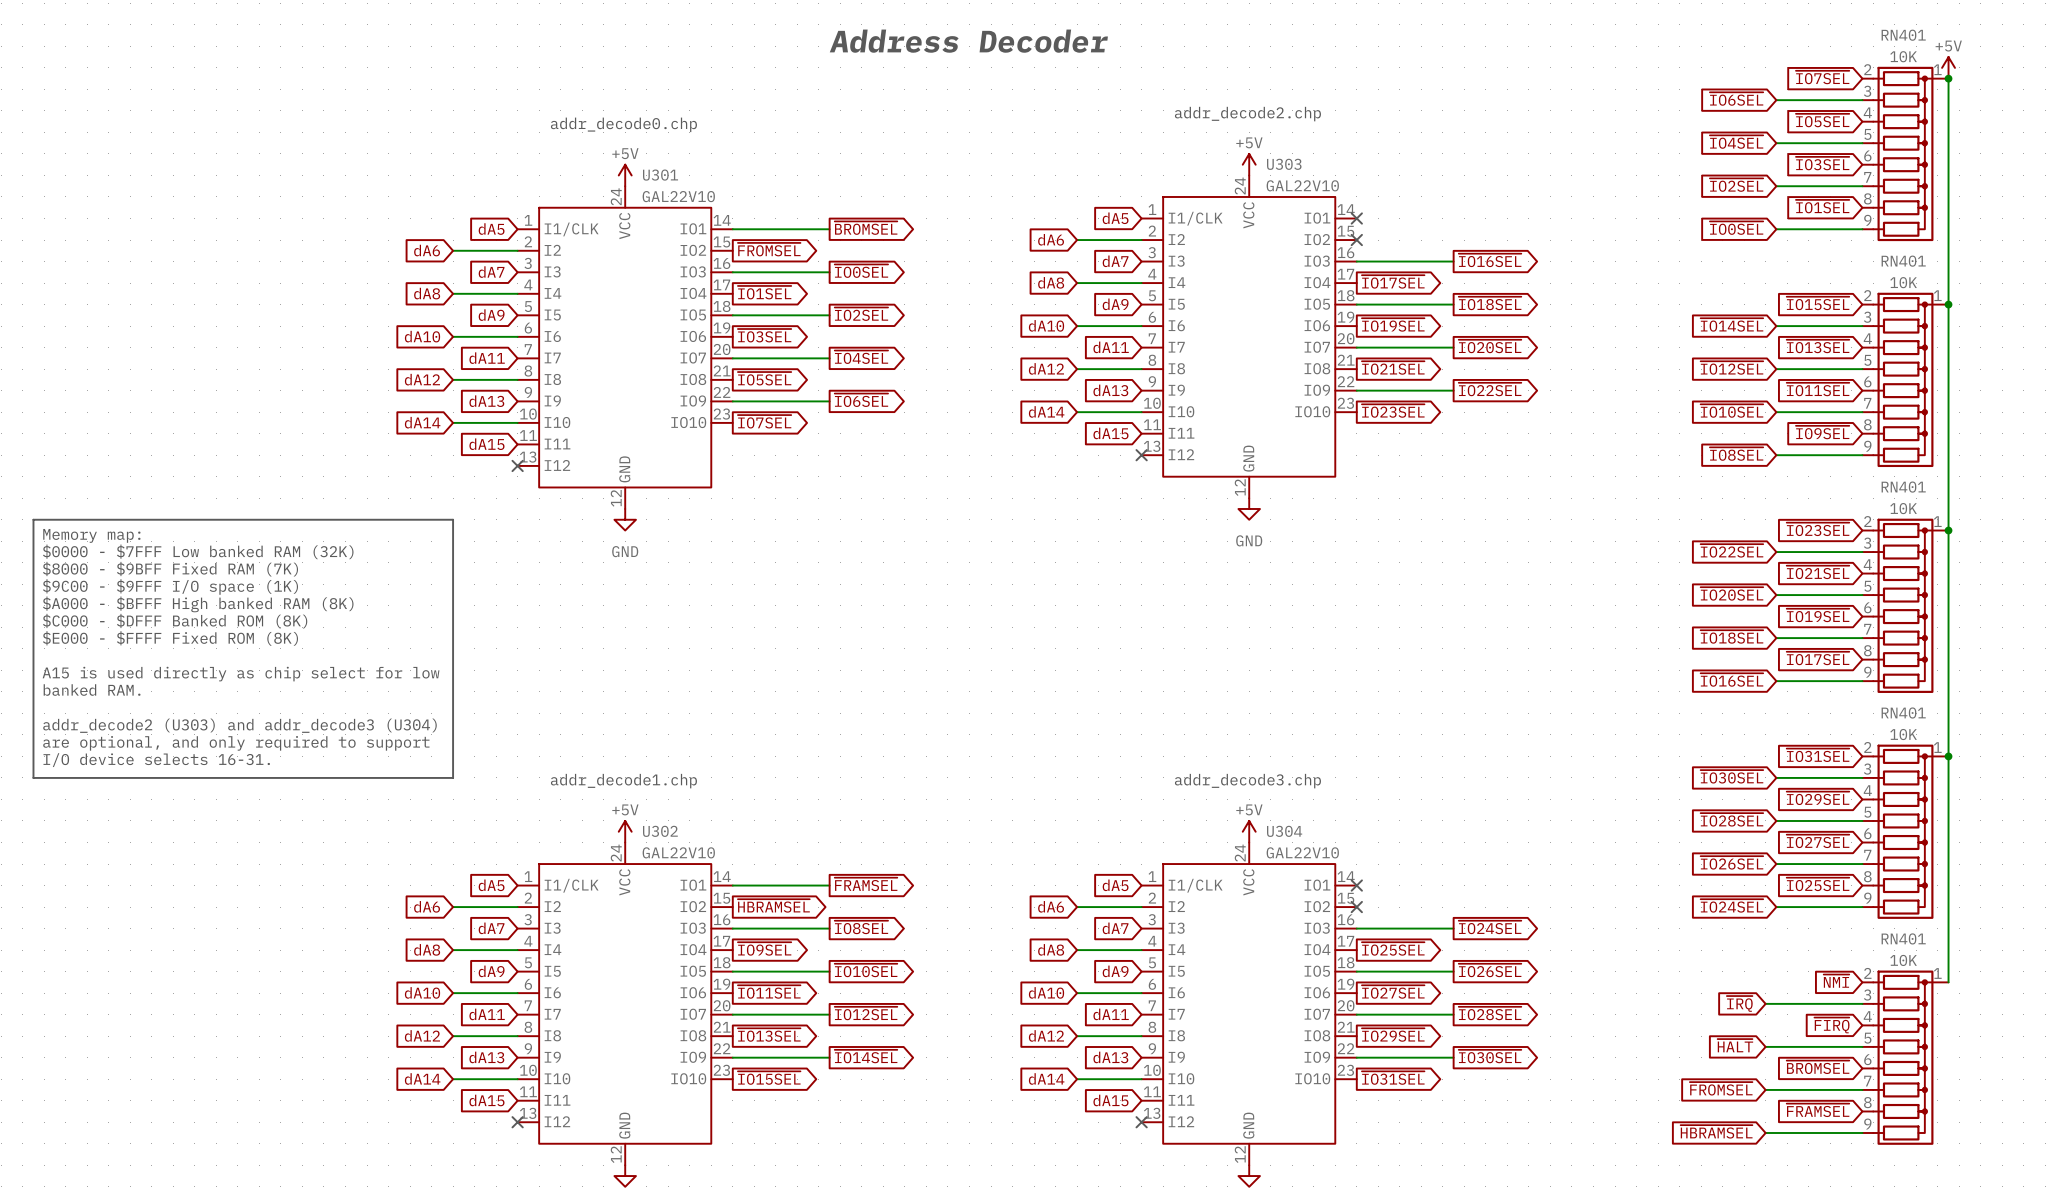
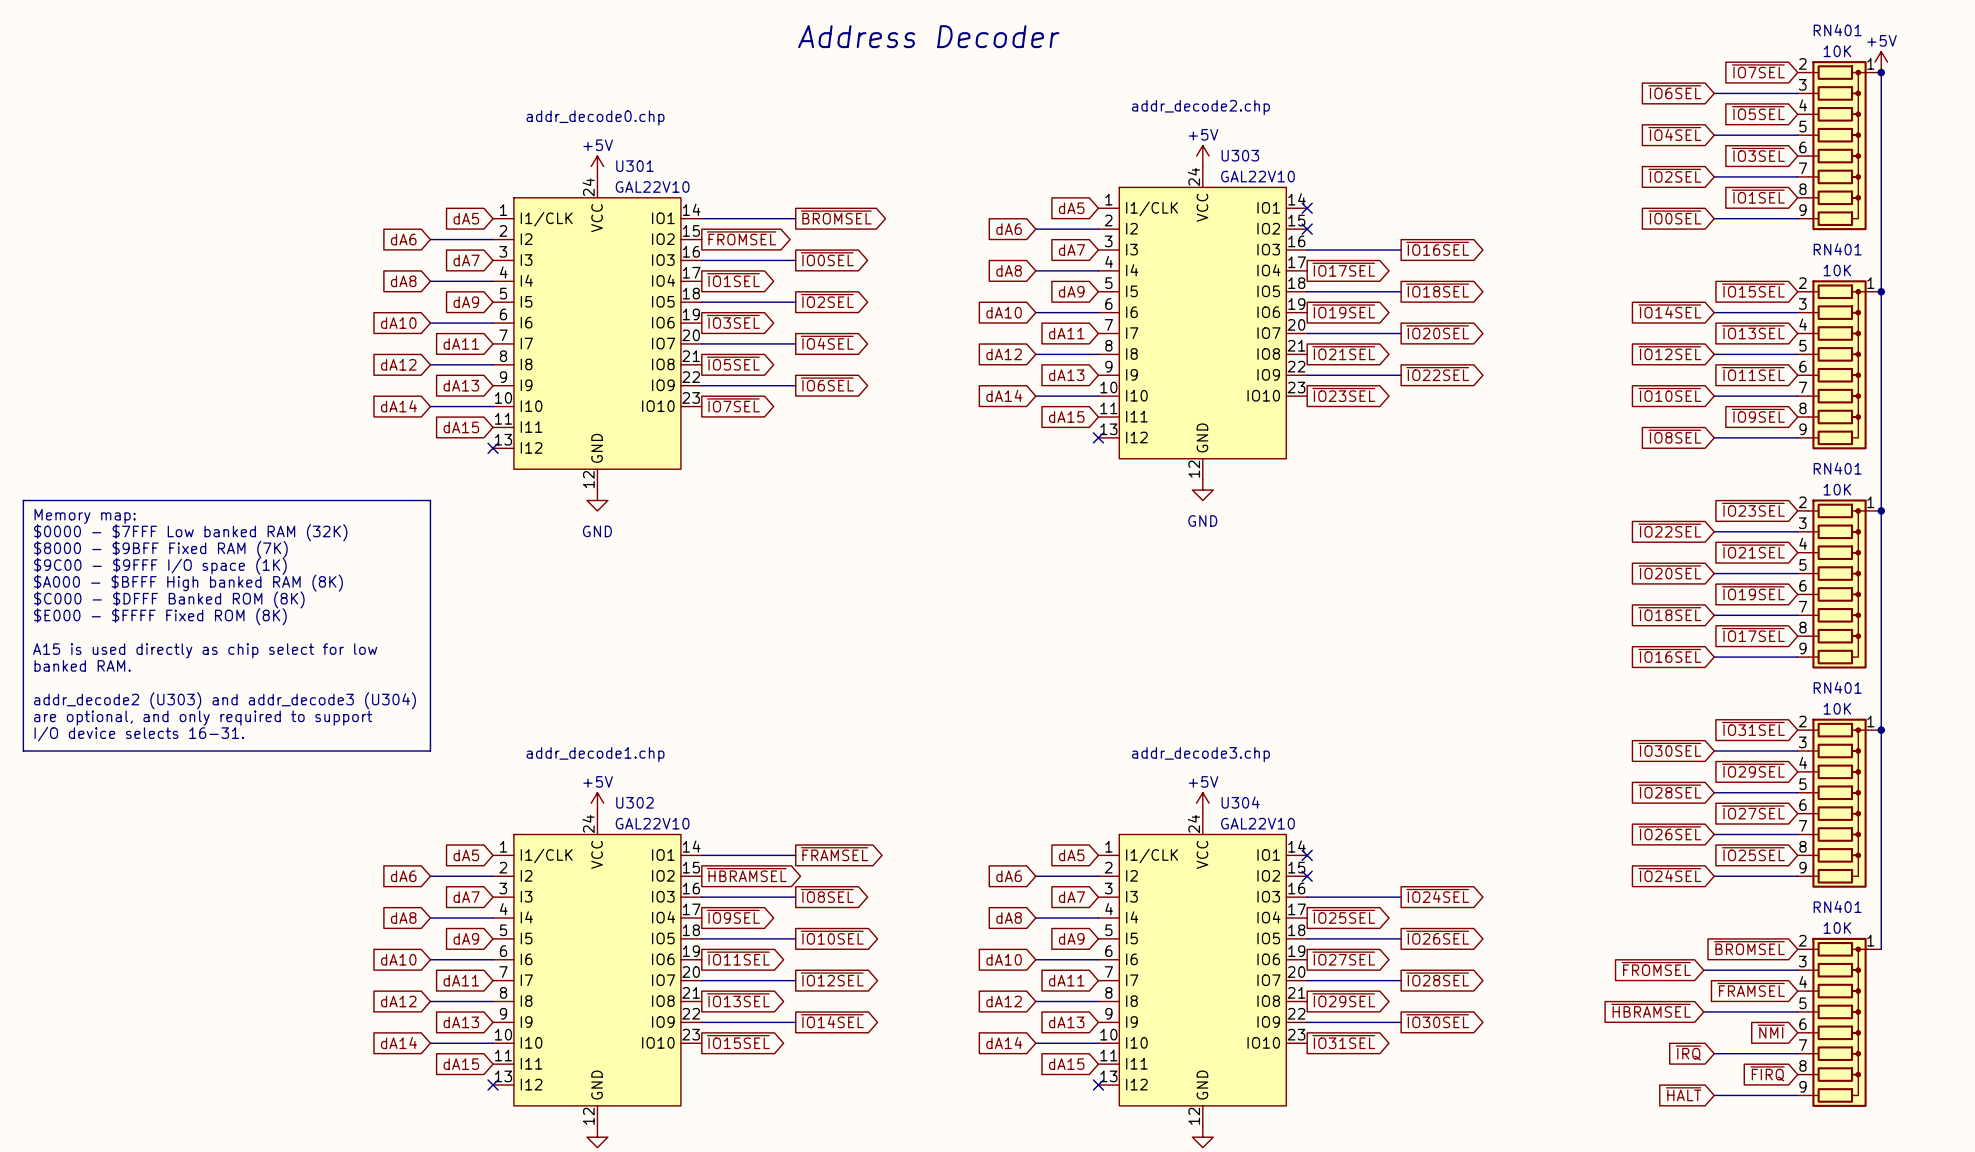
global label: ~{NMI} (1836, 981) -> ~{BROMSEL} (1749, 948)
global label: ~{IRQ} (1739, 1003) -> ~{FROMSEL} (1656, 968)
global label: ~{FIRQ} (1831, 1025) -> ~{FRAMSEL} (1751, 989)
global label: ~{HALT} (1735, 1045) -> ~{HBRAMSEL} (1651, 1010)
global label: ~{BROMSEL} (1818, 1067) -> ~{NMI} (1771, 1031)
global label: ~{FROMSEL} (1721, 1088) -> none
global label: none -> ~{IRQ} (1688, 1052)
wire: (1765, 1089) (1776, 1089) -> none
global label: ~{FRAMSEL} (1818, 1110) -> ~{FIRQ} (1767, 1073)
global label: ~{HBRAMSEL} (1716, 1131) -> ~{HALT} (1683, 1094)
wire: (1765, 1132) (1776, 1132) -> none

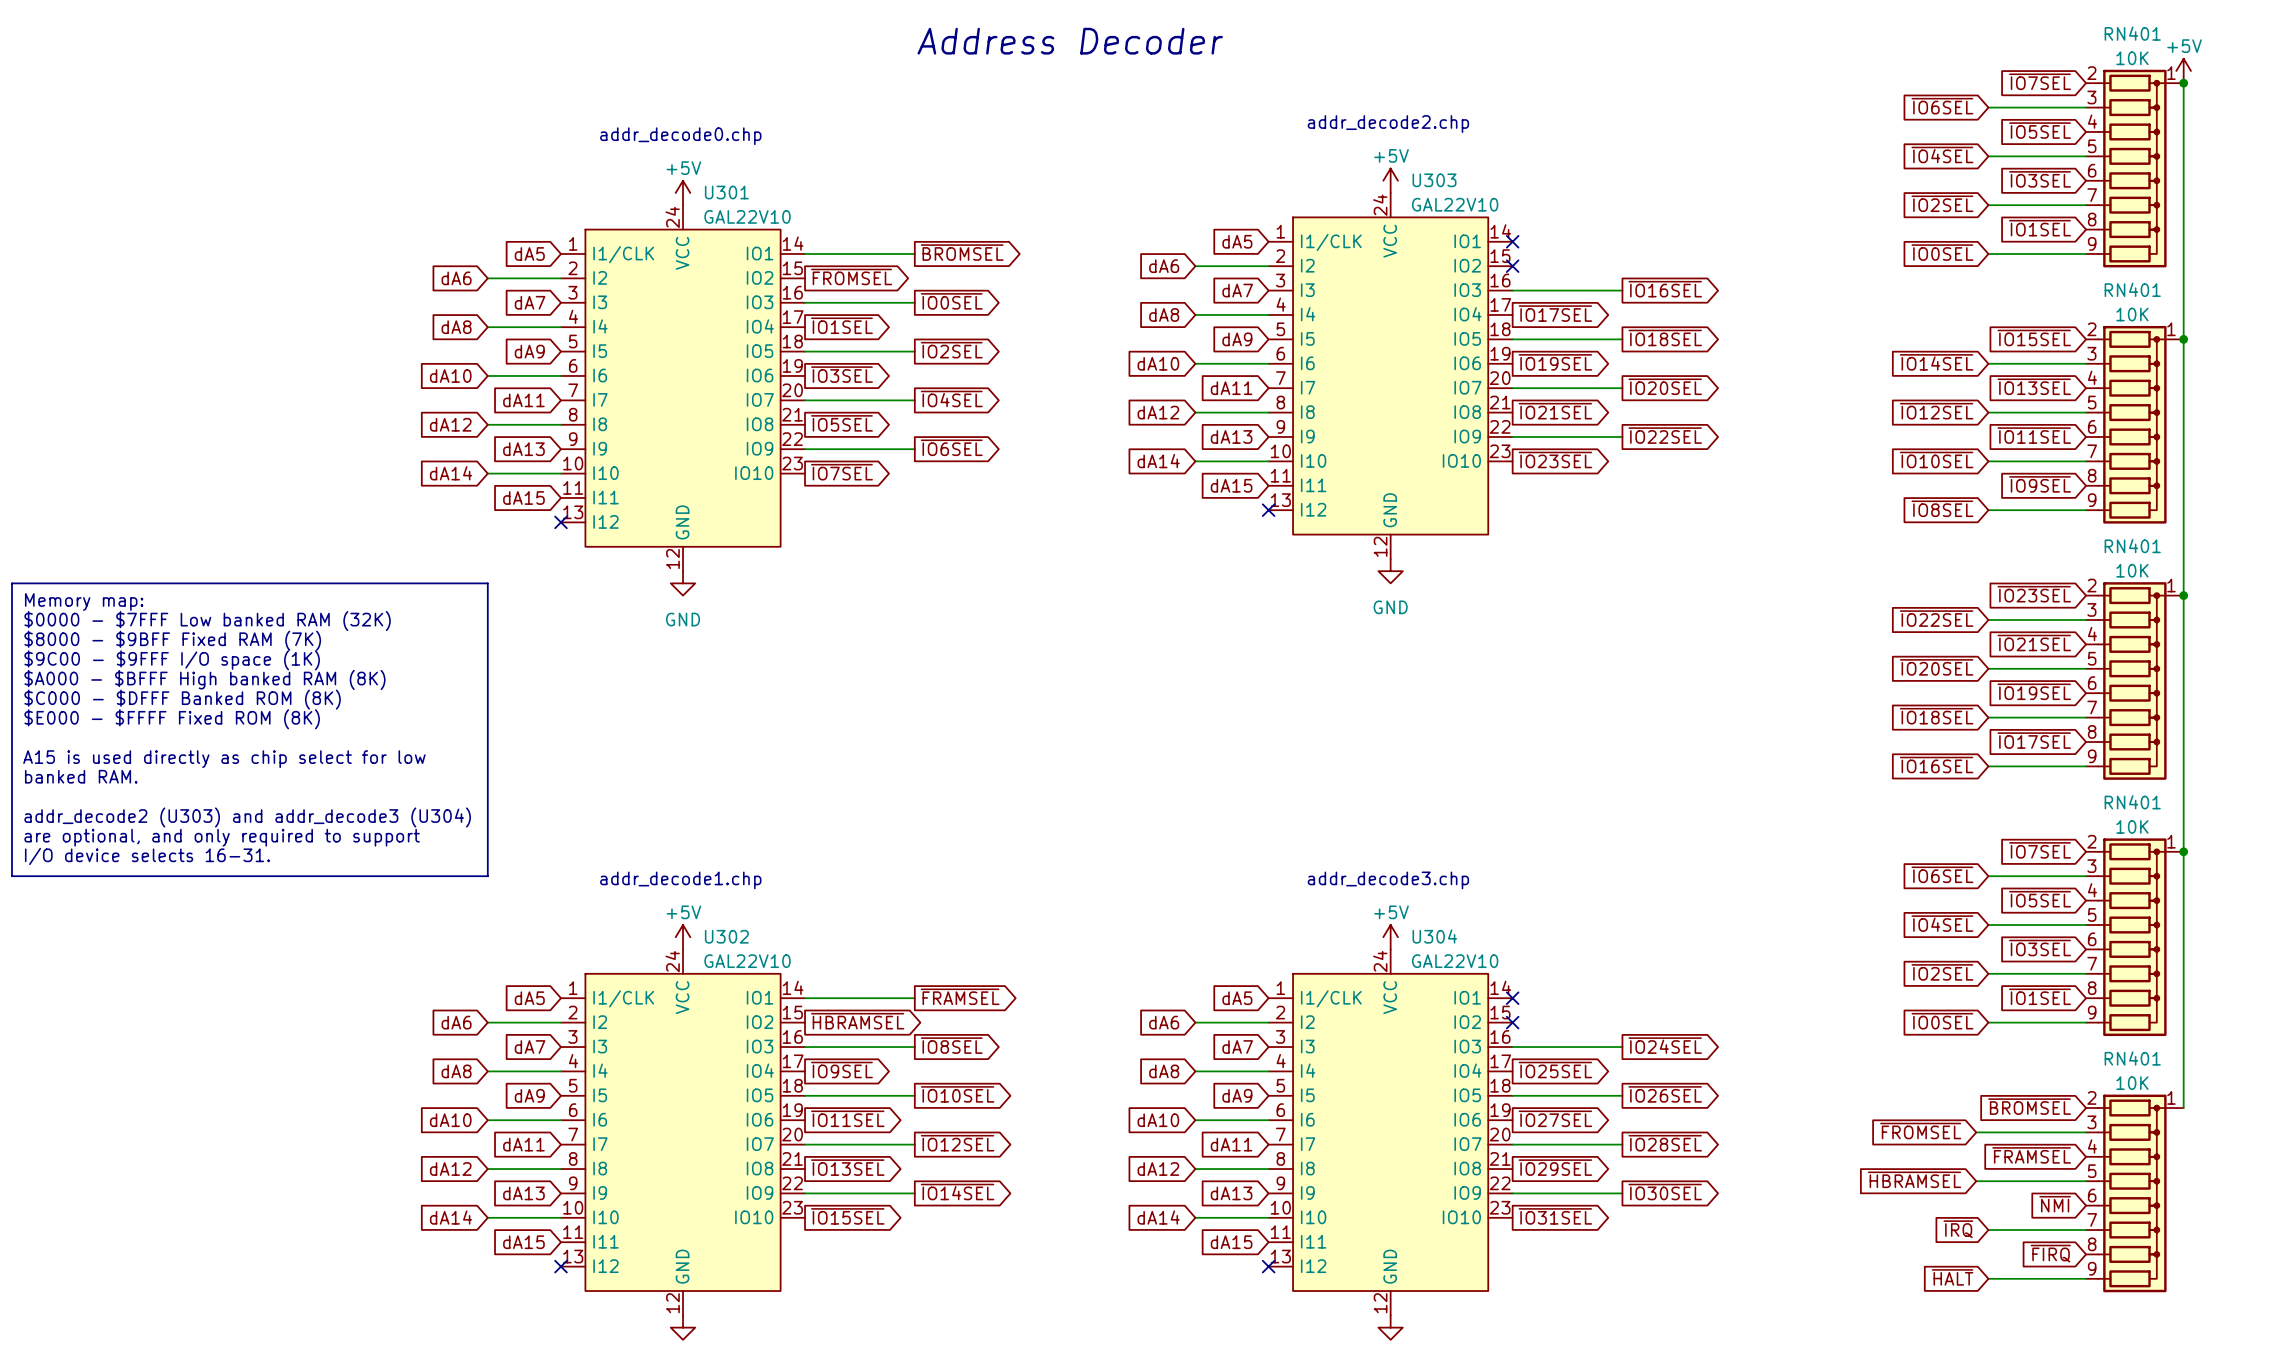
global label: ~{IO31SEL} (1753, 728) -> ~{IO7SEL} (2040, 850)
global label: ~{IO30SEL} (1669, 749) -> ~{IO6SEL} (1942, 874)
global label: ~{IO29SEL} (1753, 770) -> ~{IO5SEL} (2040, 899)
global label: ~{IO28SEL} (1669, 791) -> ~{IO4SEL} (1942, 923)
global label: ~{IO27SEL} (1753, 812) -> ~{IO3SEL} (2040, 948)
global label: ~{IO26SEL} (1669, 833) -> ~{IO2SEL} (1942, 972)
global label: ~{IO25SEL} (1753, 854) -> ~{IO1SEL} (2040, 996)
global label: ~{IO24SEL} (1669, 875) -> ~{IO0SEL} (1942, 1021)

